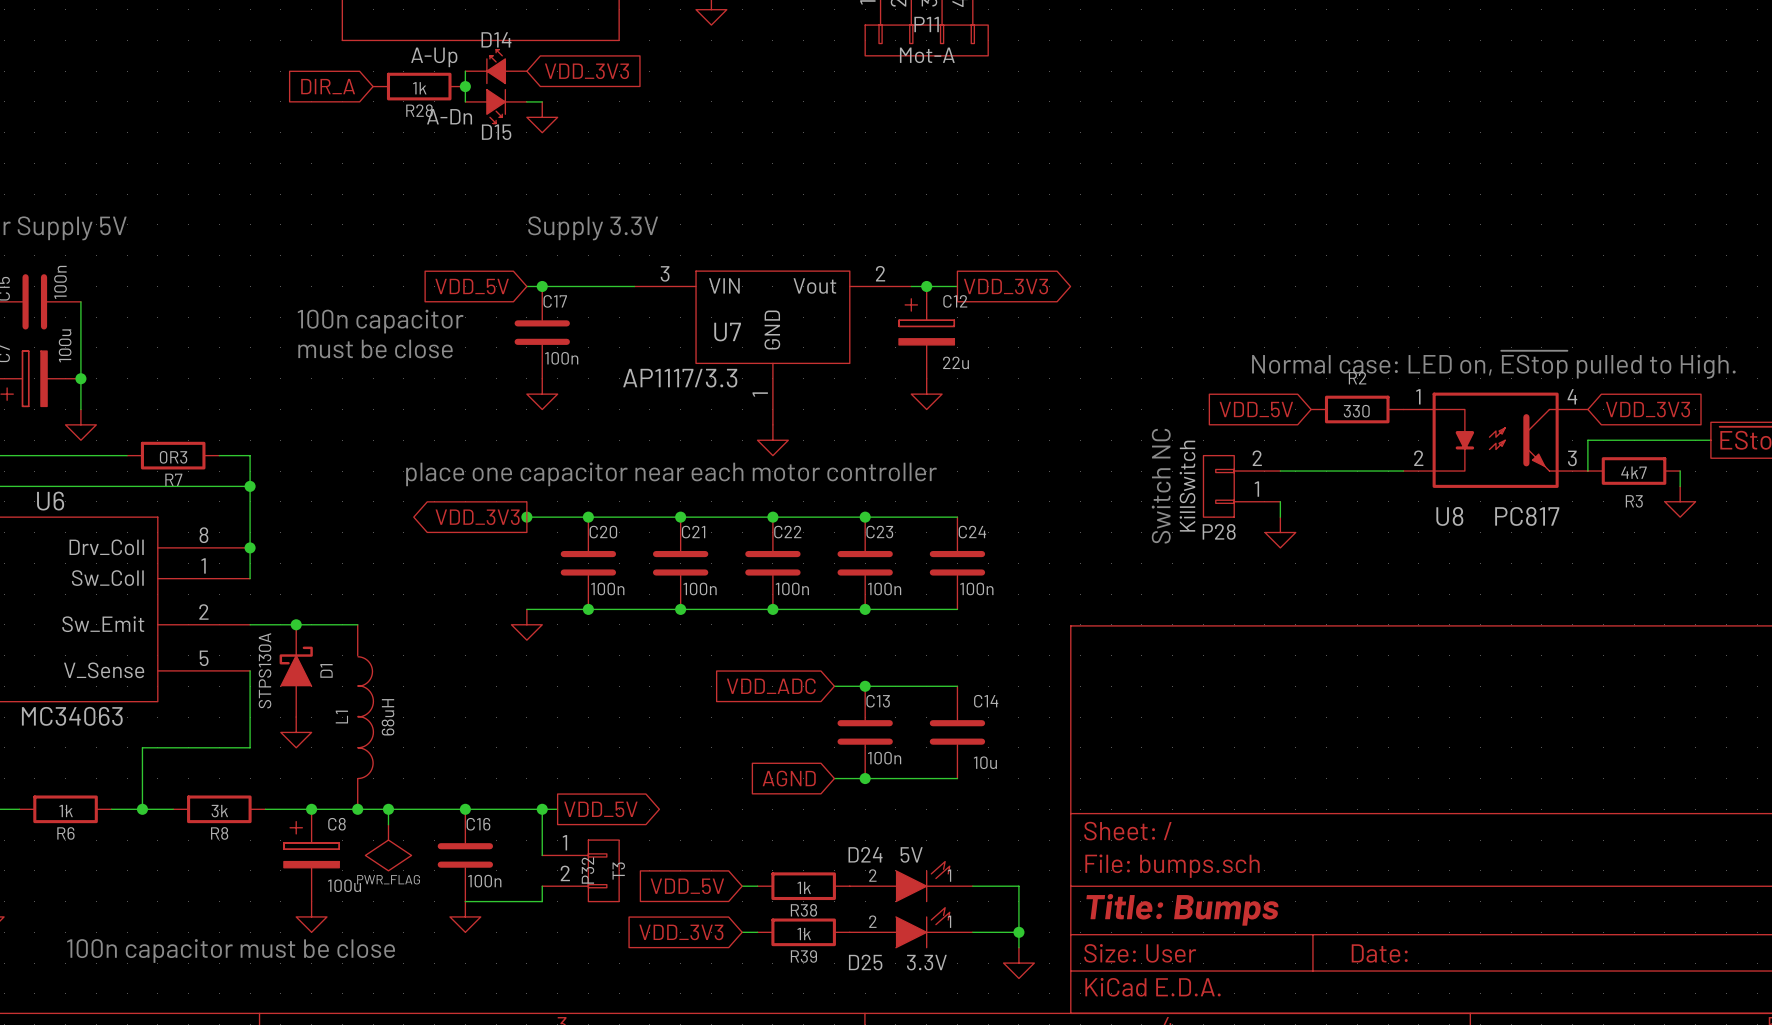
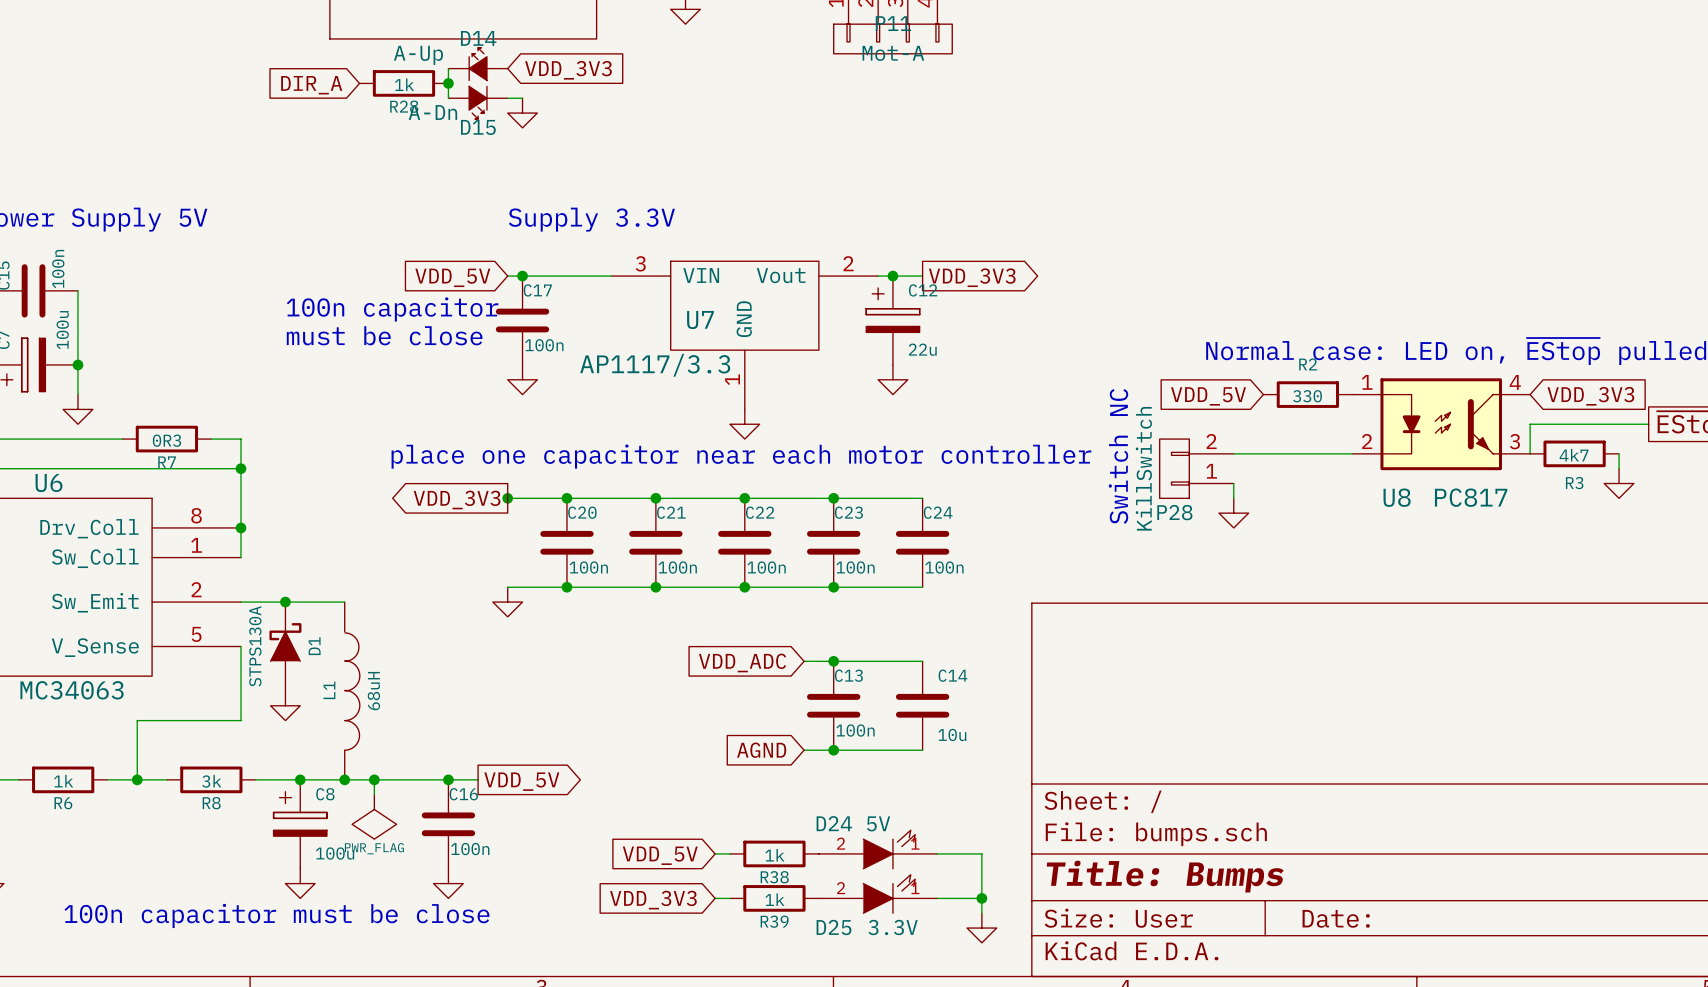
wire: (496, 809) (557, 809) -> none
wire: (542, 809) (542, 855) -> none
junction: (542, 809) -> none
global label position: VDD_5V (600, 809) -> VDD_5V (521, 781)
P32: T3 (580, 870) -> none
wire: (542, 886) (542, 901) (465, 901) -> none

